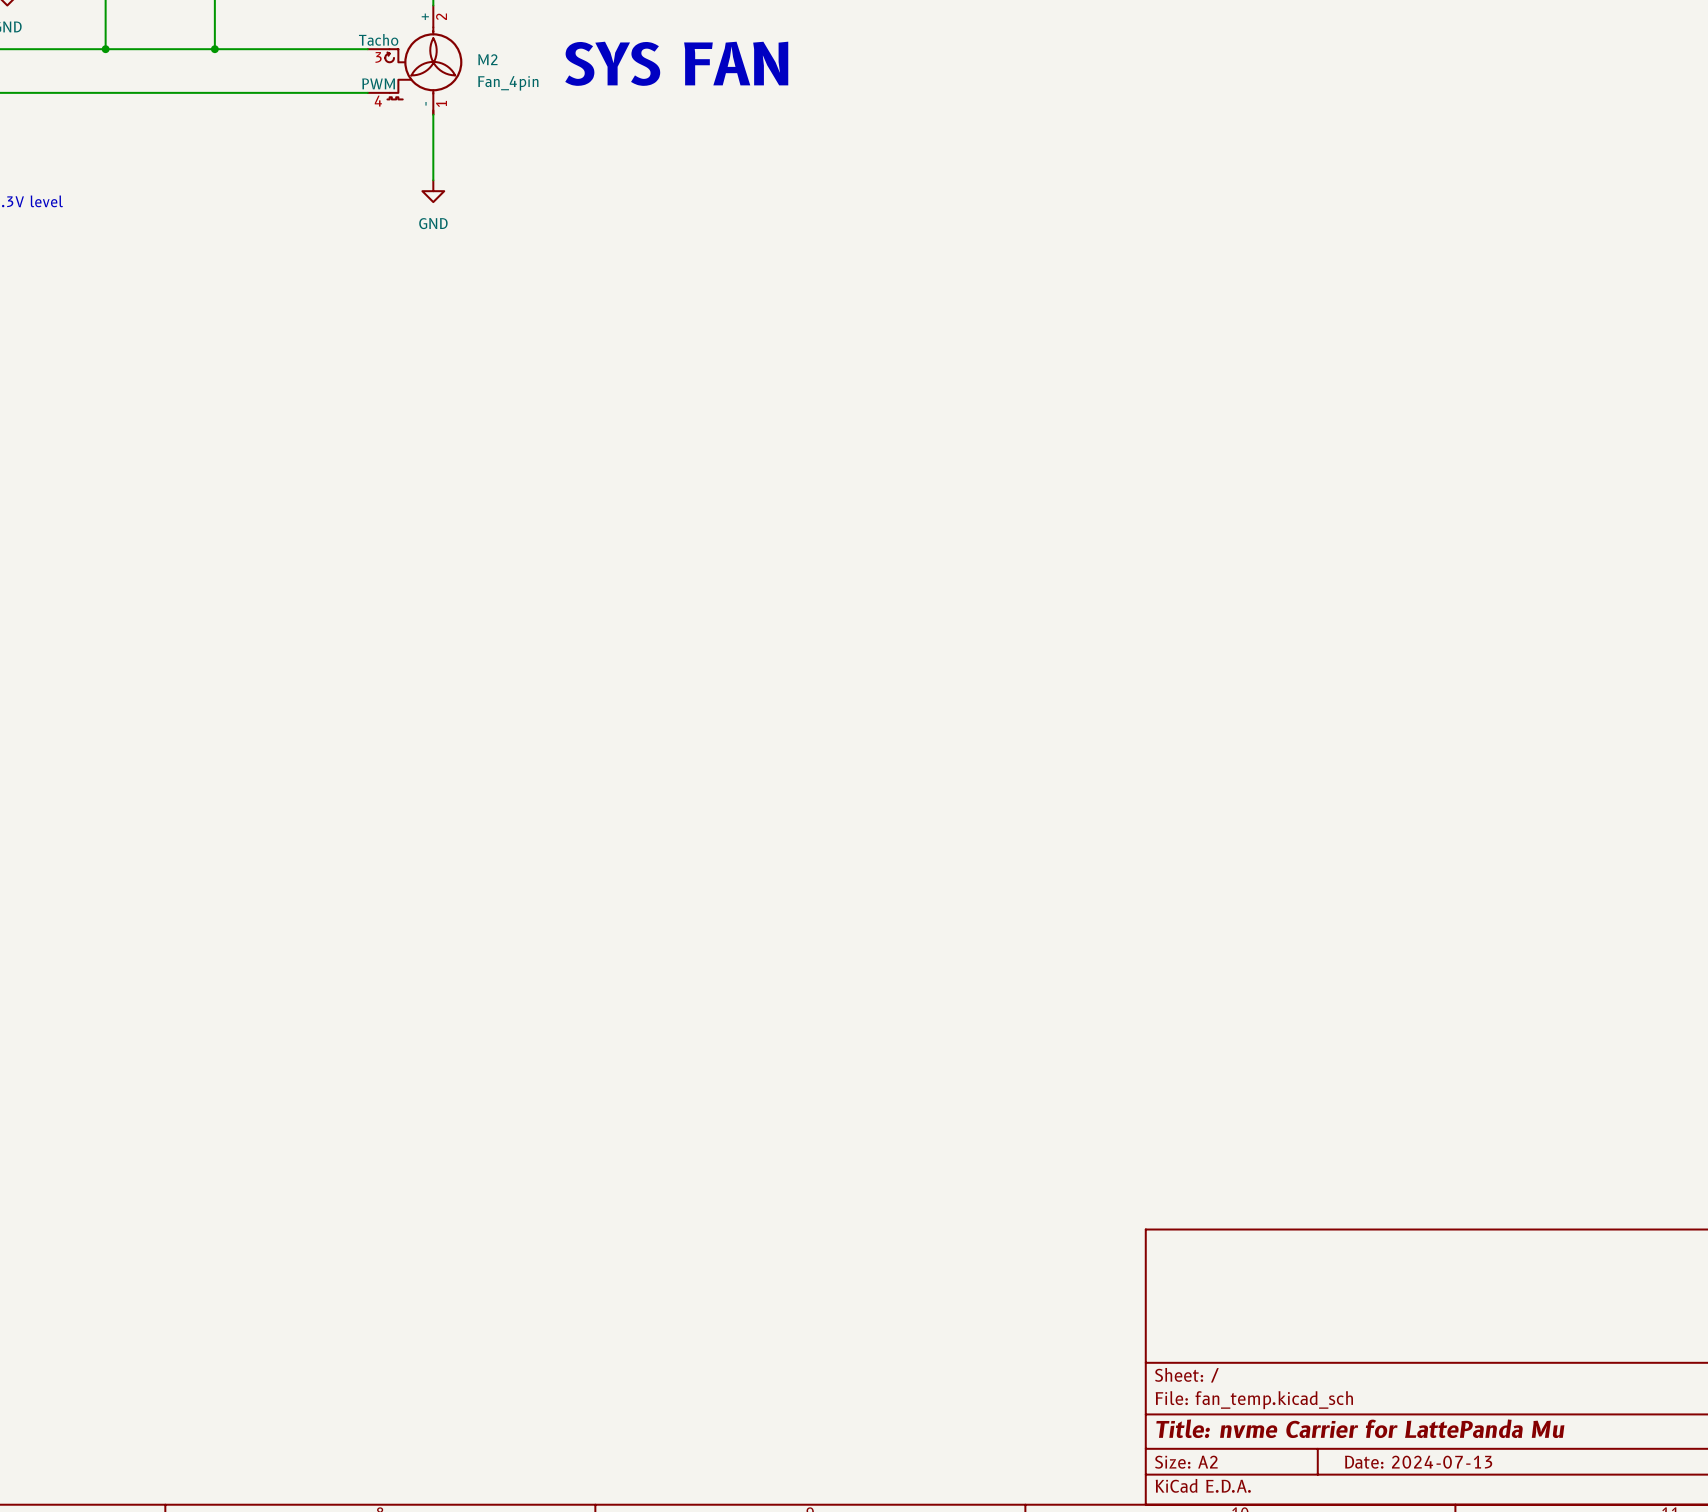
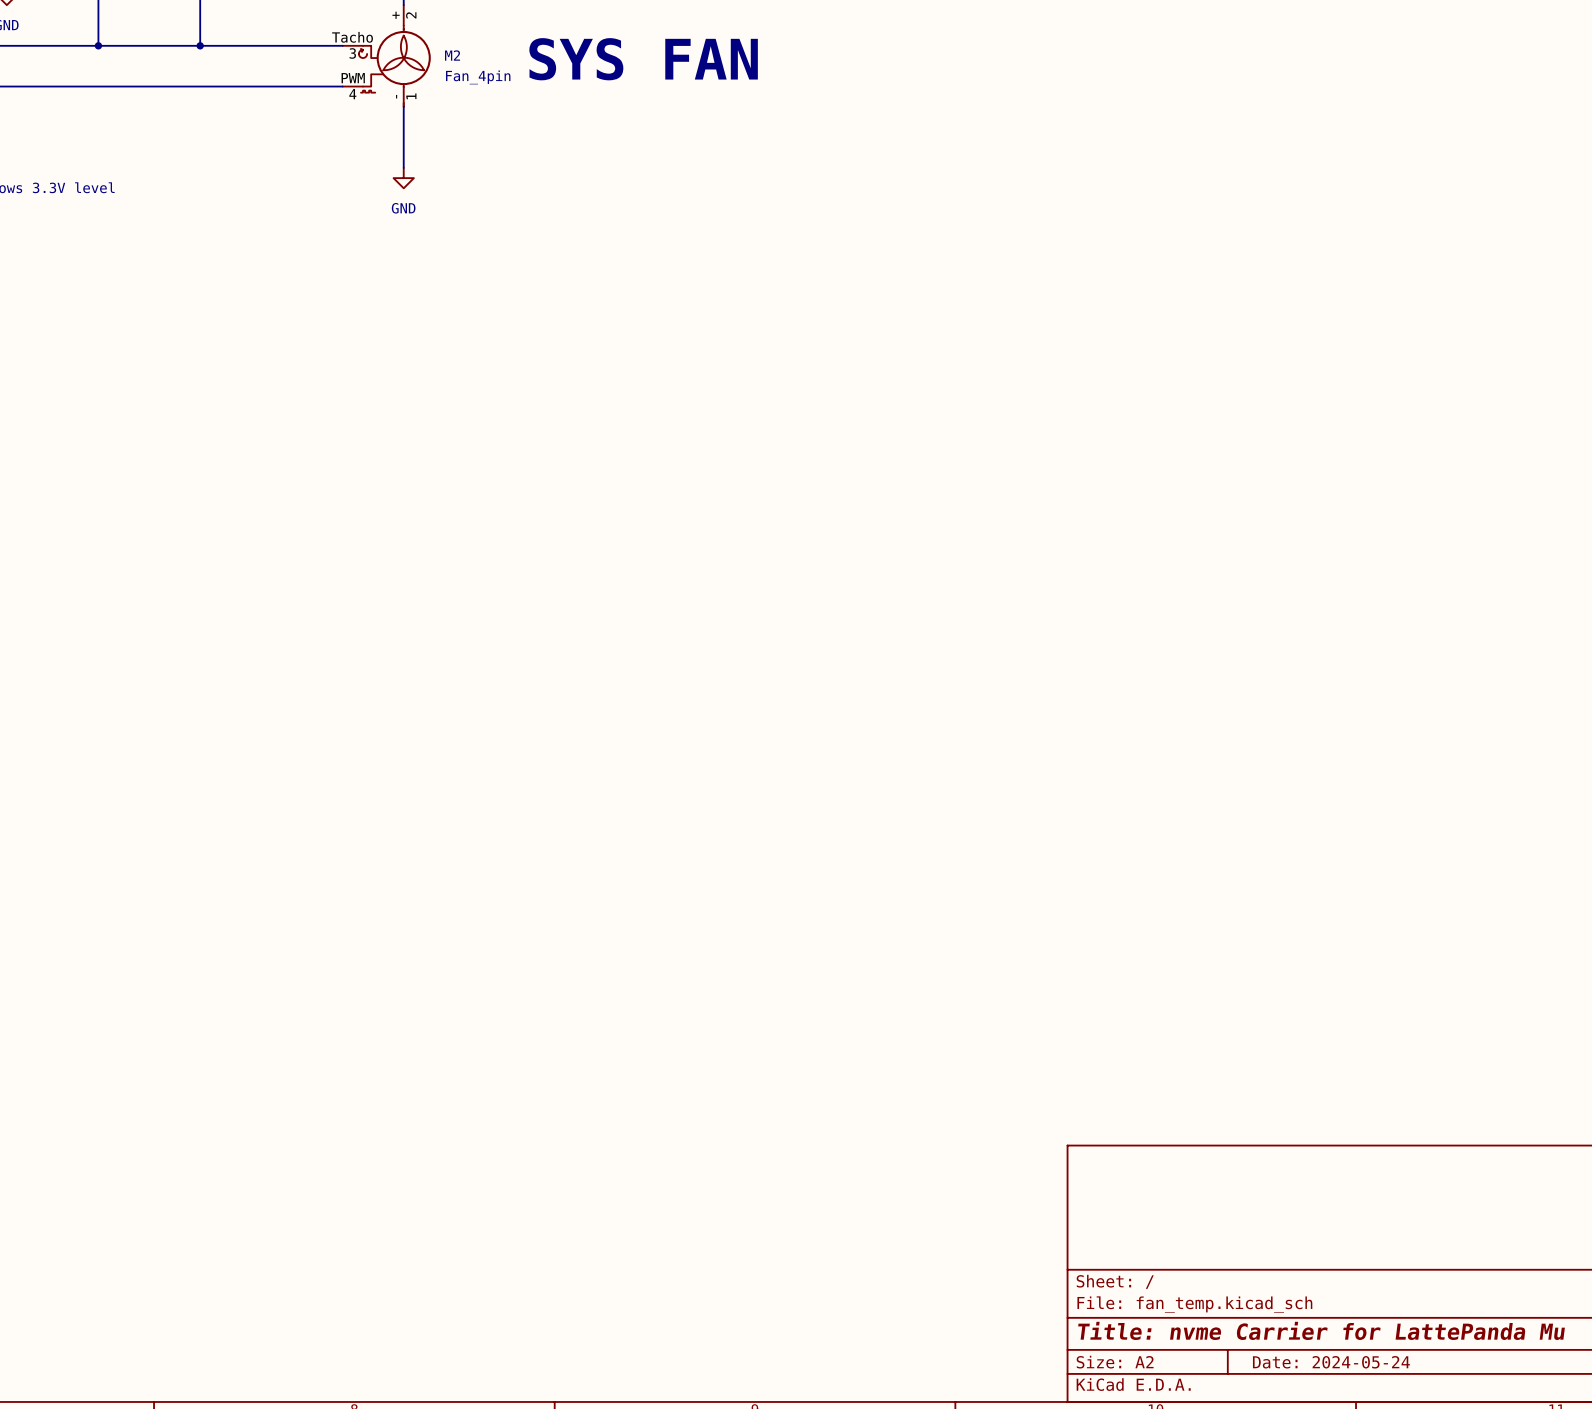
title block: Date: 2024-07-13 (1418, 1462) -> Date: 2024-05-24 (1331, 1362)

